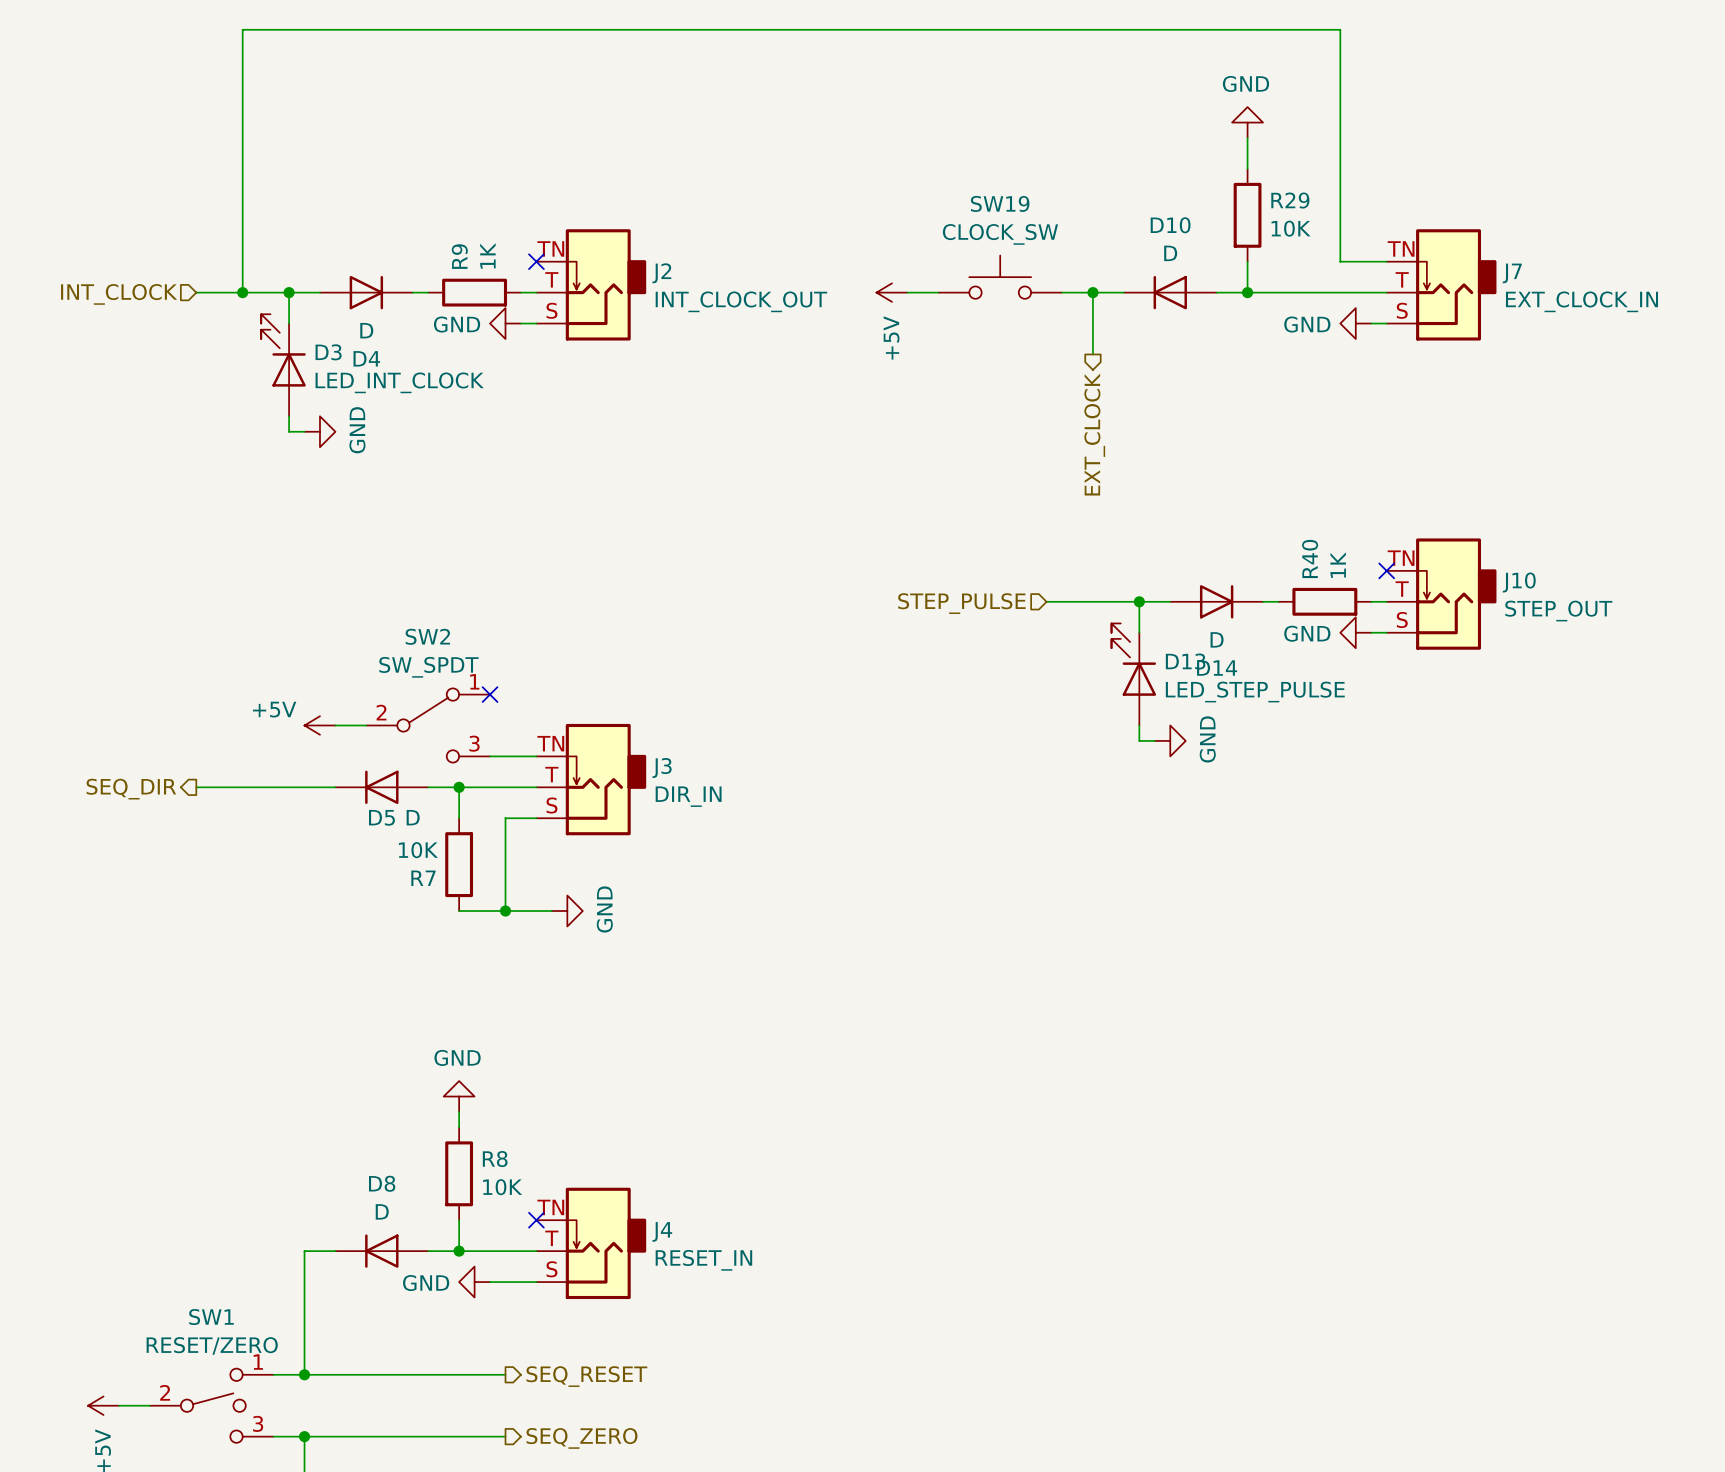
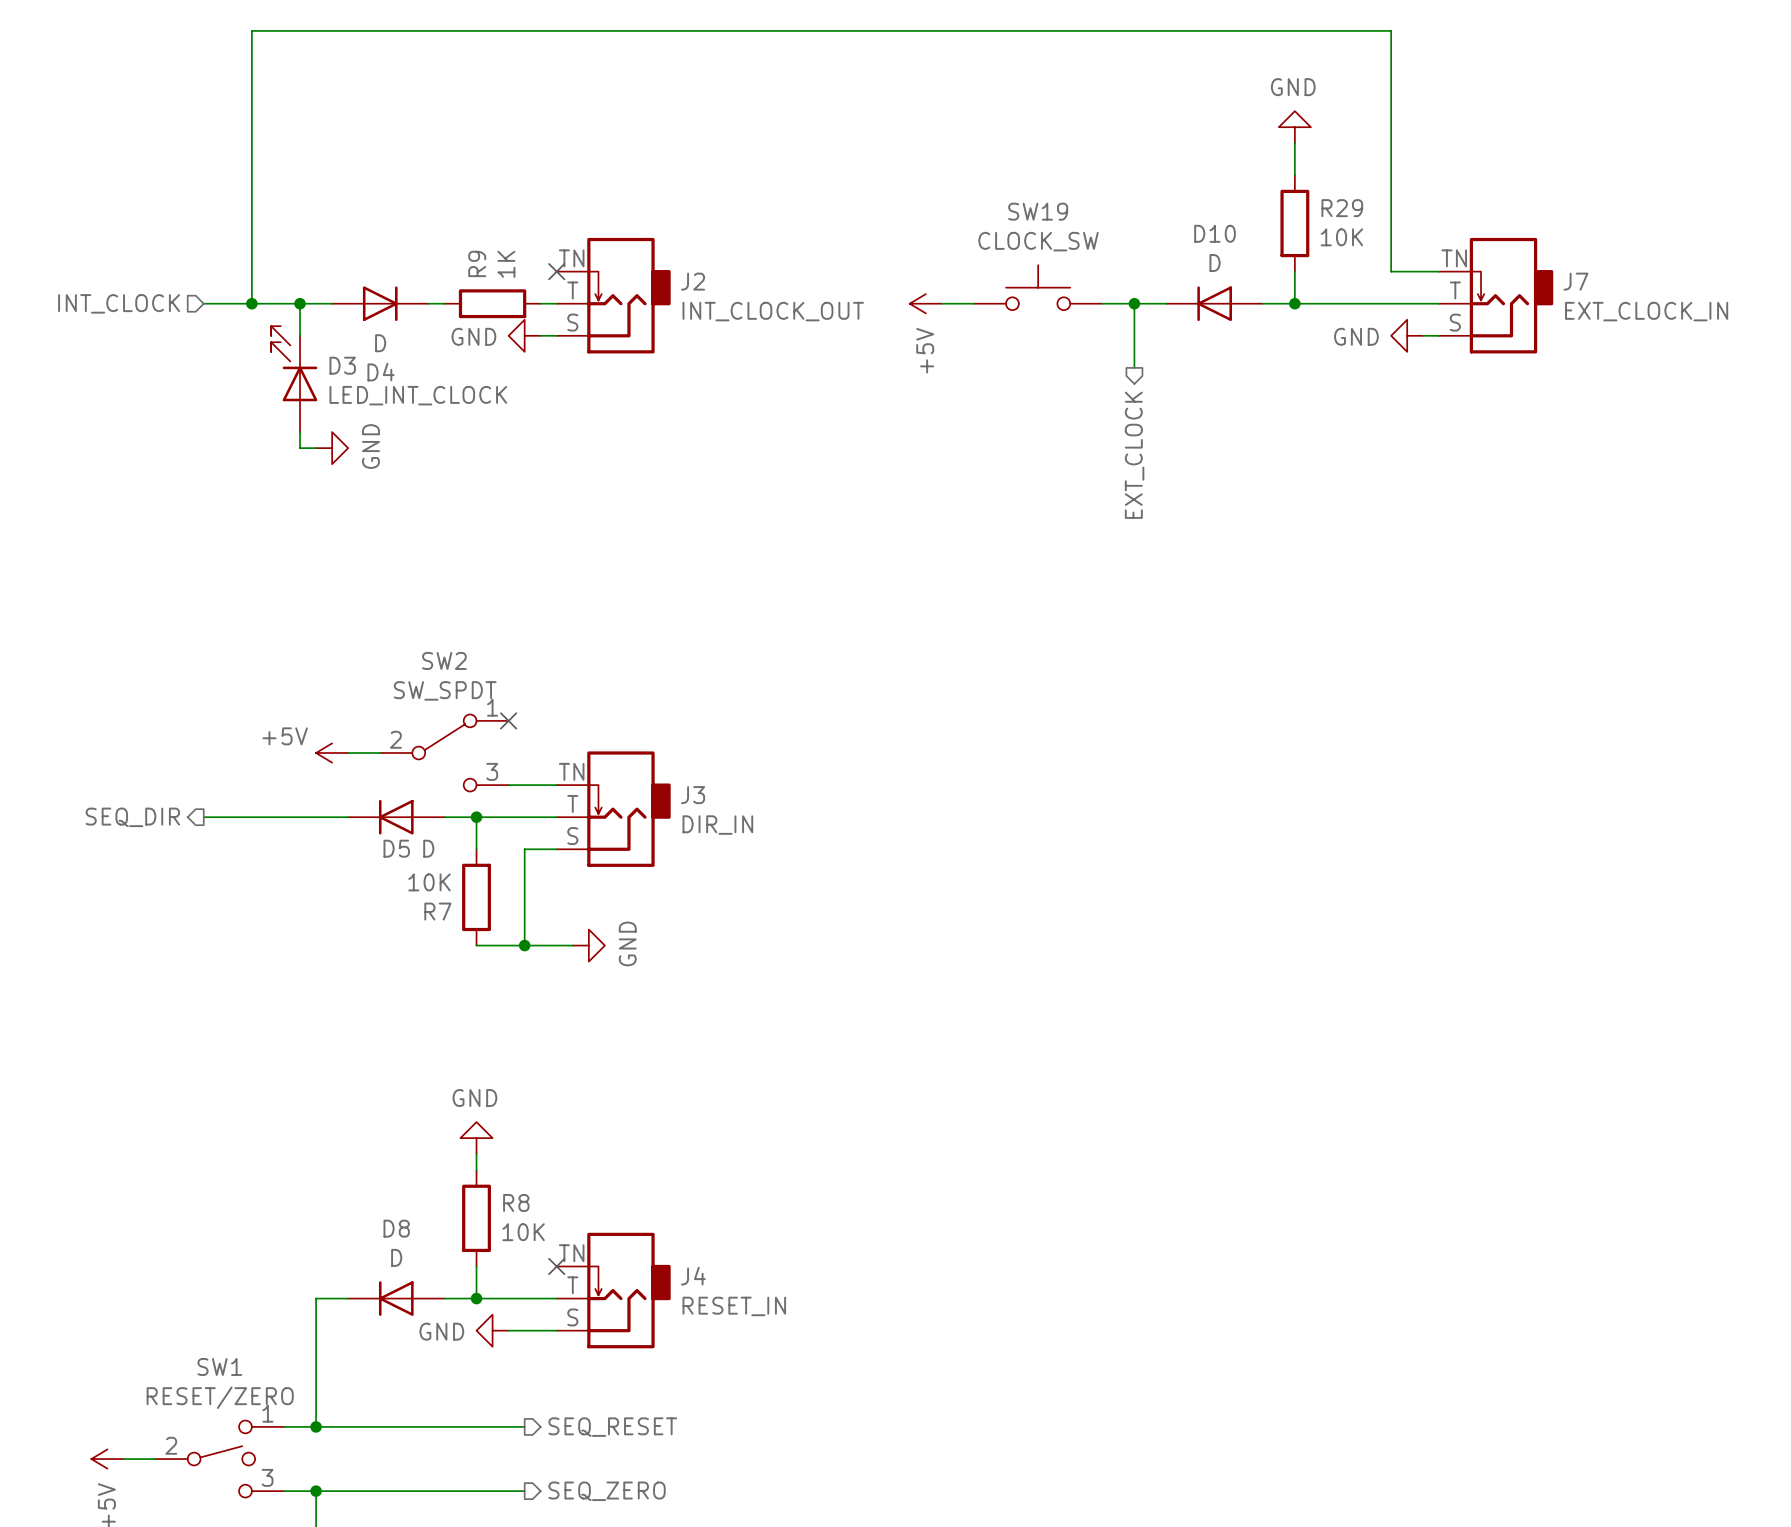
no-connect mark: (1386, 570) -> none
J10: STEP_OUT (1441, 594) -> none
wire: (1046, 601) (1170, 601) -> none
wire: (1139, 601) (1139, 632) -> none
junction: (1139, 601) -> none
D14: D (1216, 601) -> none
wire: (1263, 601) (1278, 601) -> none
R40: 1K (1324, 601) -> none
wire: (1371, 601) (1386, 601) -> none
hierarchical label: STEP_PULSE (961, 603) -> none
power symbol: GND (1355, 632) -> none
wire: (1371, 632) (1386, 632) -> none
D13: LED_STEP_PULSE (1133, 674) -> none
wire: (1139, 725) (1139, 740) (1154, 740) -> none
power symbol: GND (1170, 740) -> none

